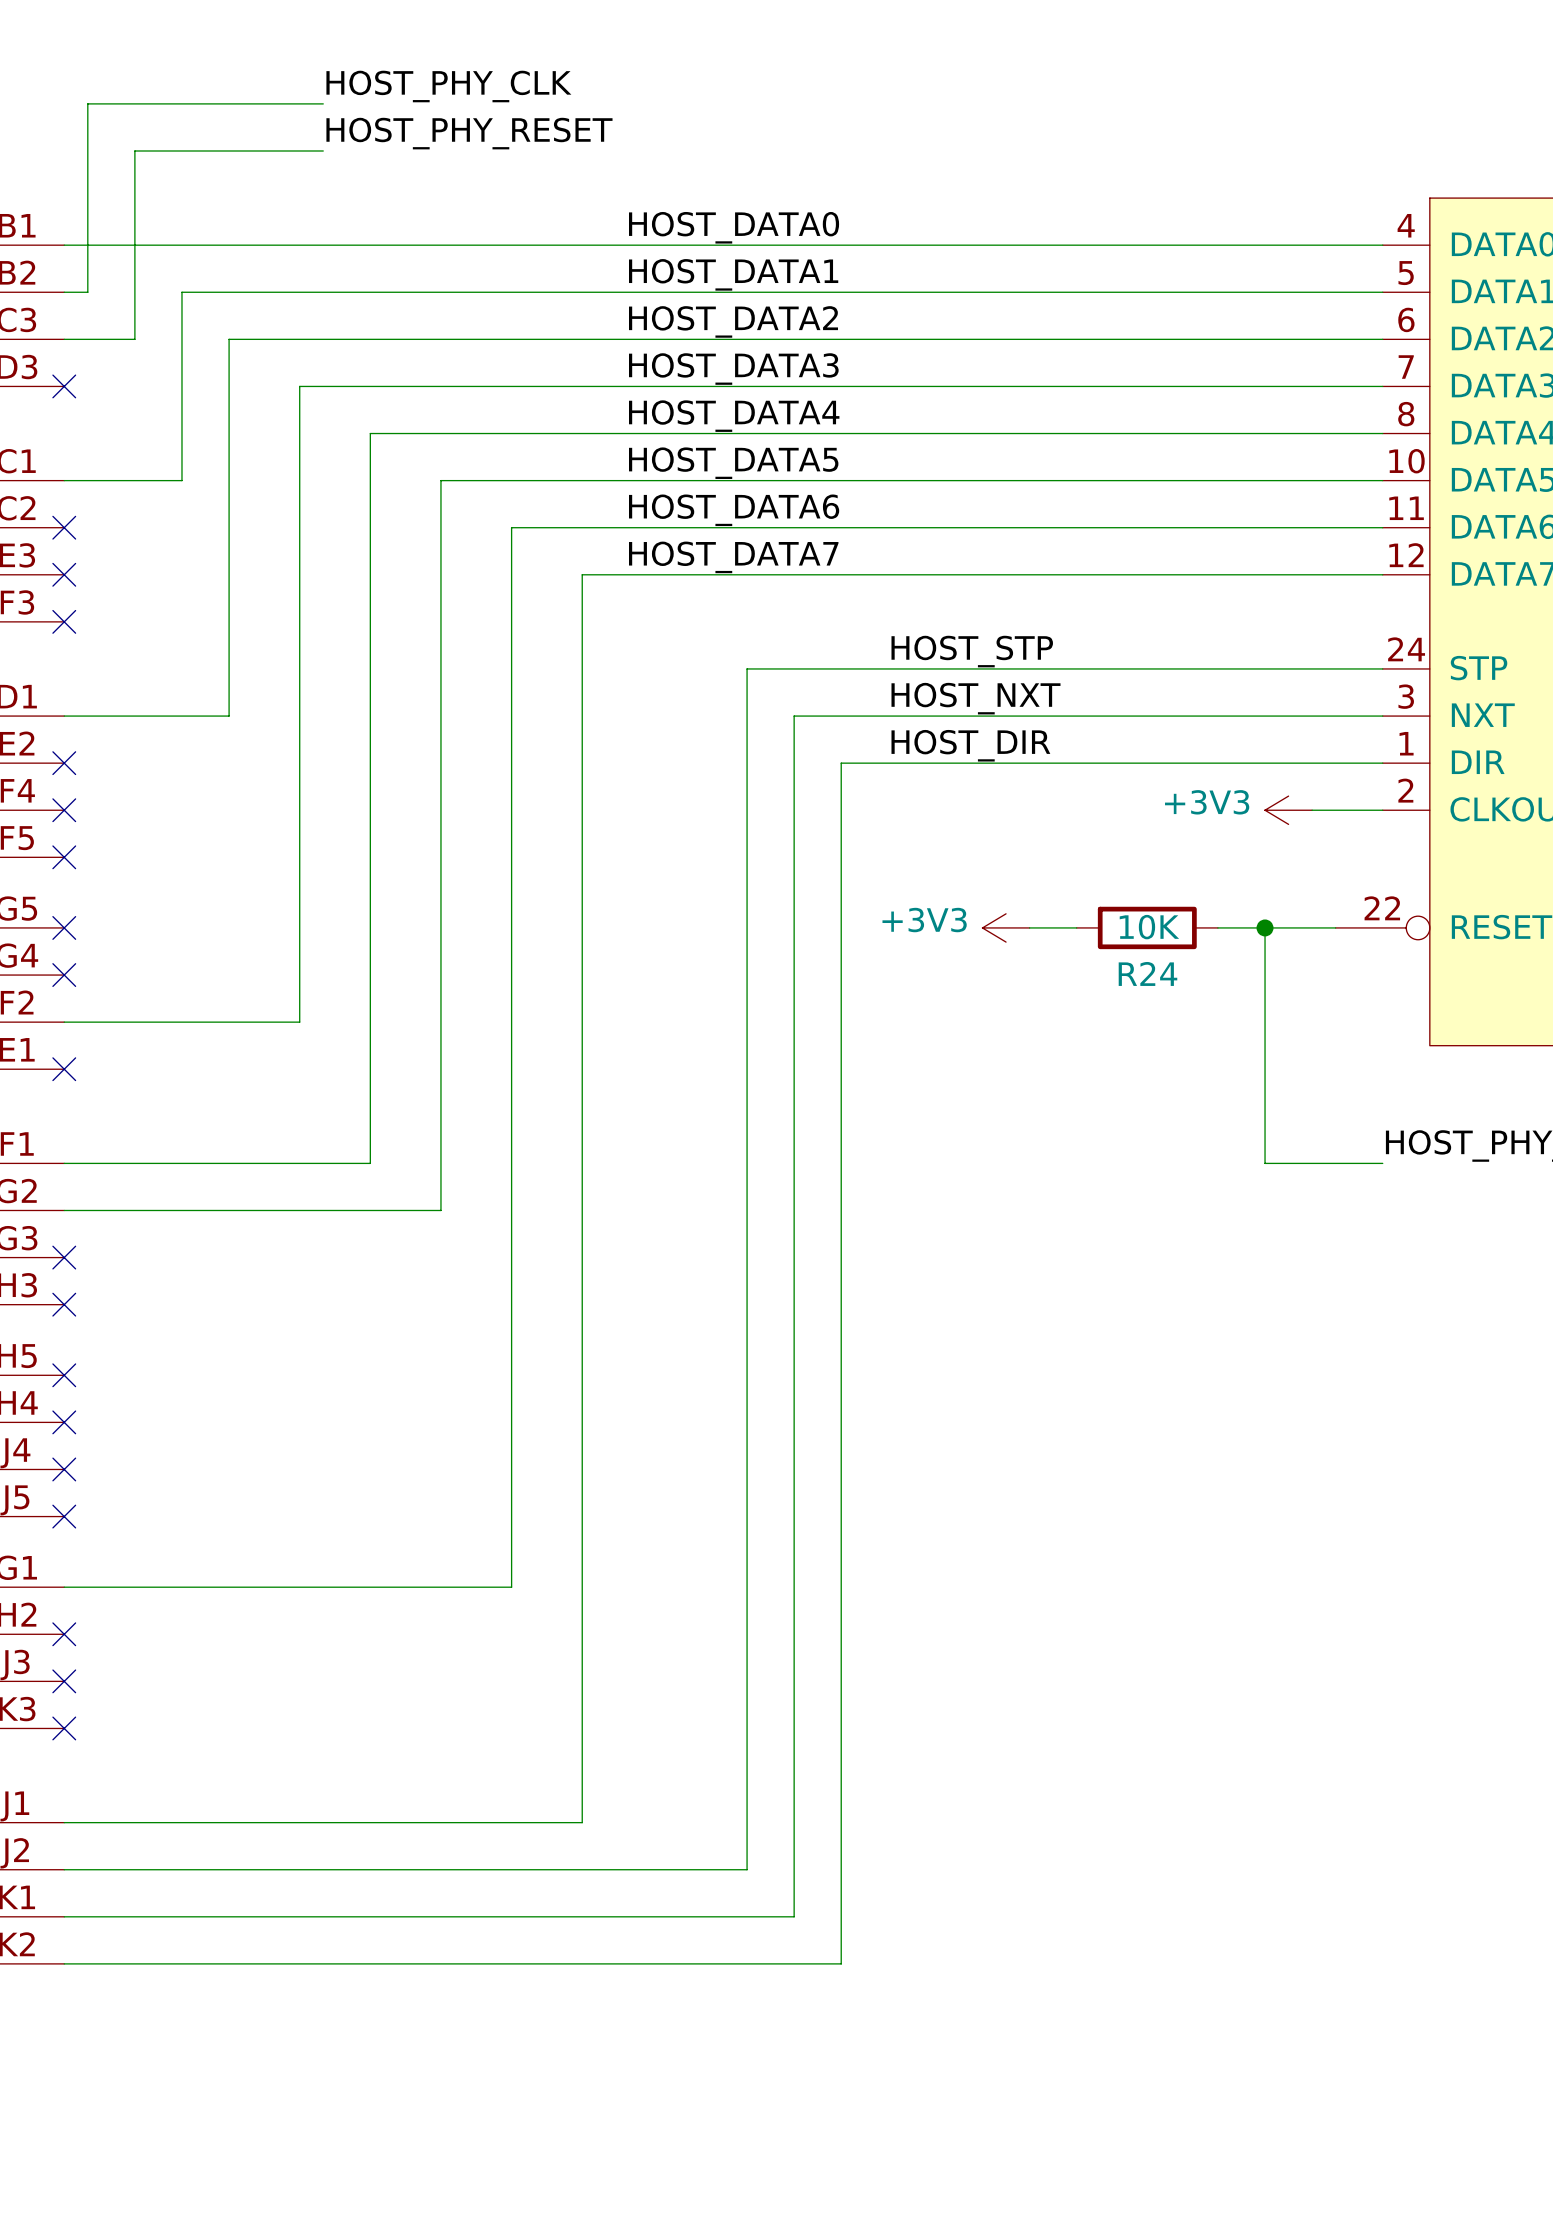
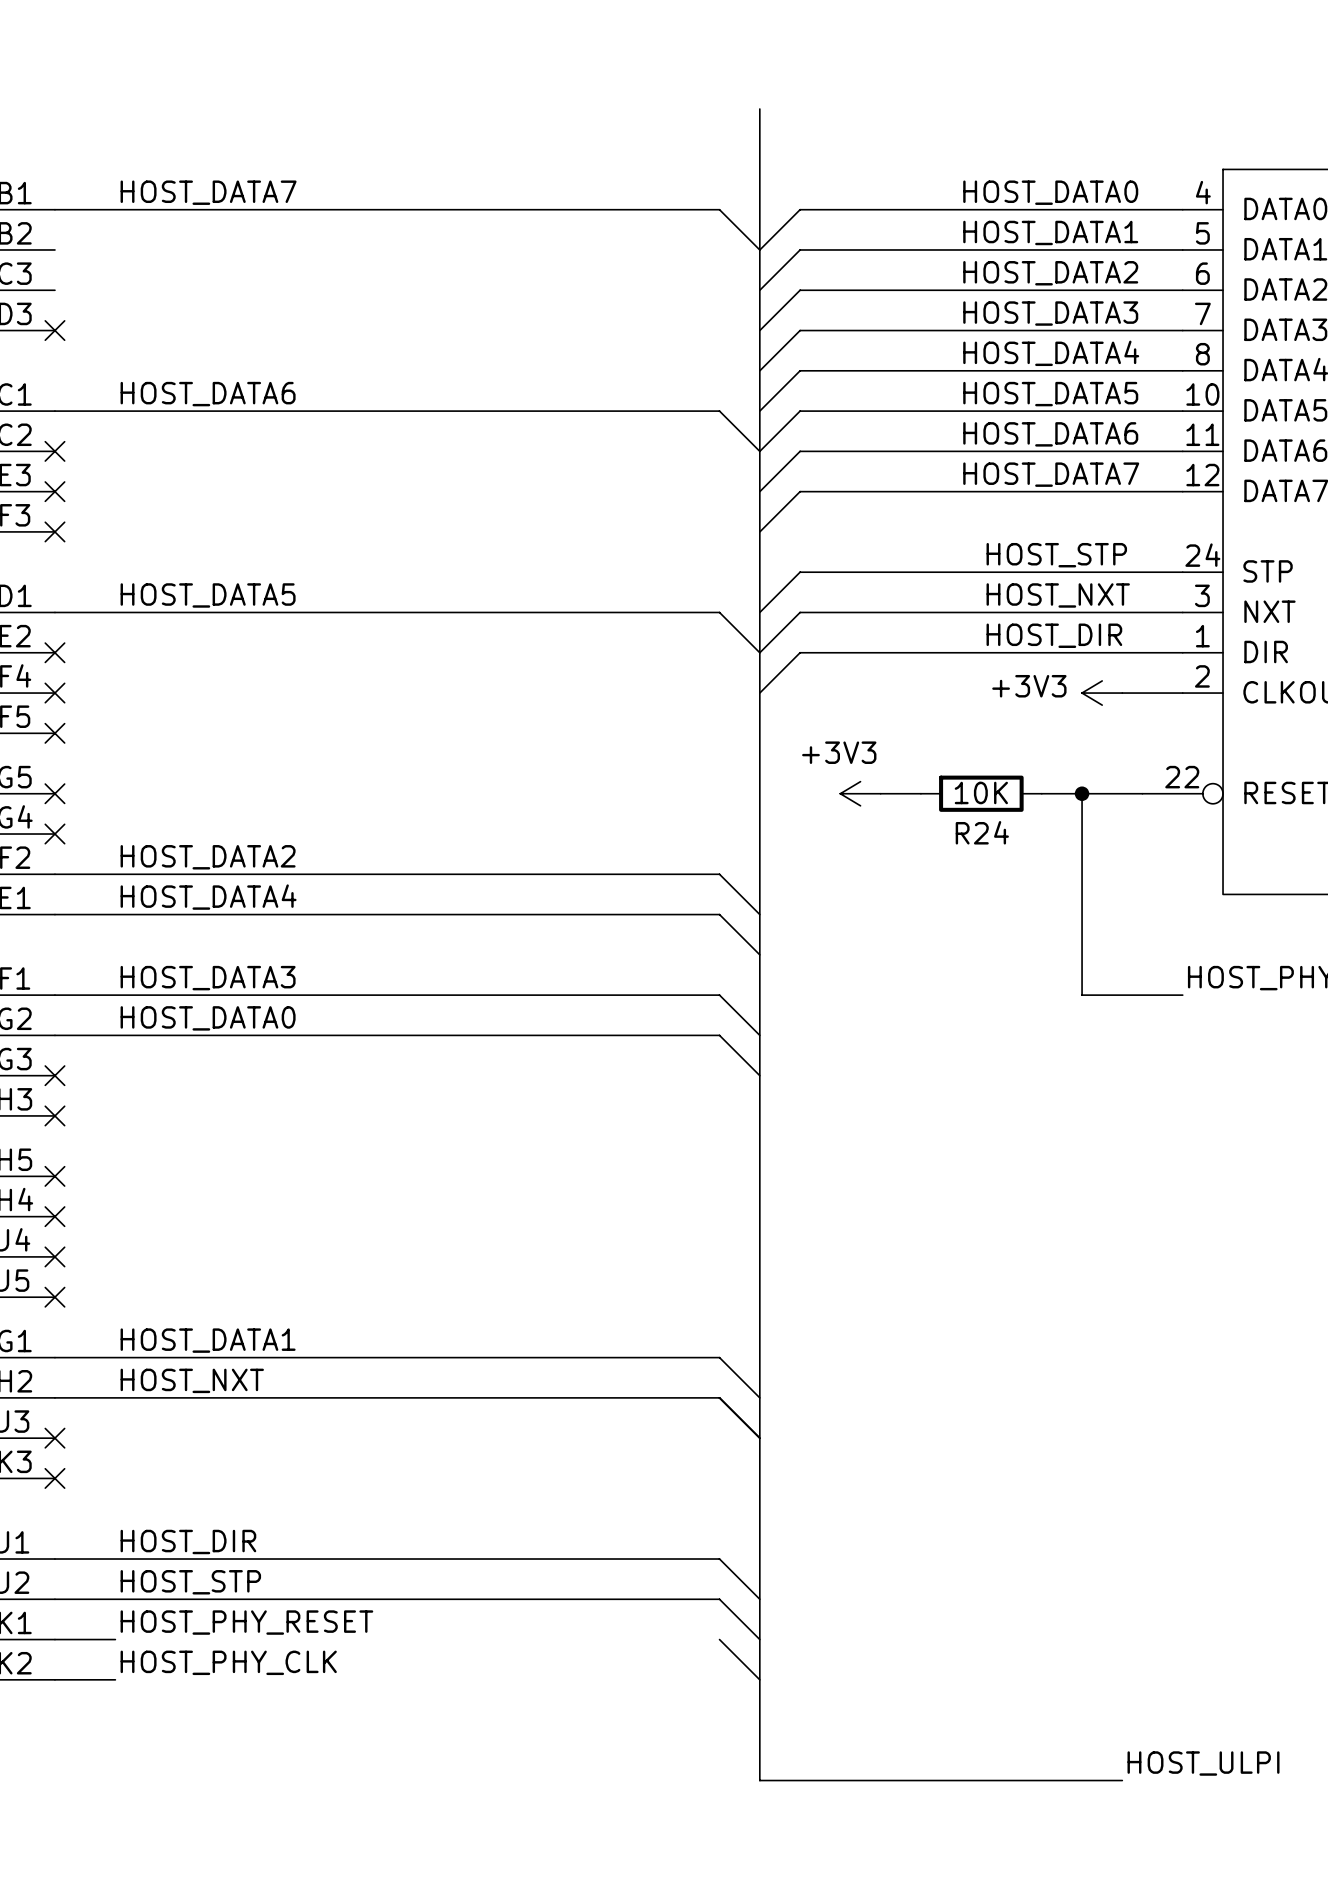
label: HOST_PHY_CLK (448, 86) -> none
wire: (323, 103) (87, 103) (87, 292) (64, 292) -> none
bus: none -> (759, 109) (759, 1780) (1122, 1780)
label: HOST_PHY_RESET (469, 133) -> none
wire: (323, 150) (134, 150) (134, 339) (64, 339) -> none
label: none -> HOST_DATA7 (208, 192)
label: HOST_DATA0 (734, 227) -> none
label: none -> HOST_DATA0 (1050, 192)
wire: (841, 245) (935, 245) -> (719, 209) (759, 249) (800, 209)
label: HOST_DATA1 (733, 274) -> none
label: none -> HOST_DATA1 (1050, 232)
wire: (935, 292) (181, 292) (181, 480) -> (377, 411) (155, 411)
wire: none -> (800, 249) (759, 290)
label: HOST_DATA2 (733, 321) -> none
label: none -> HOST_DATA2 (1050, 273)
wire: (935, 339) (229, 339) (229, 716) -> (679, 612) (195, 612)
wire: none -> (800, 290) (759, 330)
label: HOST_DATA3 (733, 369) -> none
label: none -> HOST_DATA3 (1050, 313)
wire: (935, 386) (299, 386) (299, 1022) -> (759, 914) (719, 874) (256, 874)
wire: none -> (800, 330) (759, 370)
label: HOST_DATA4 (734, 416) -> none
label: none -> HOST_DATA4 (1051, 353)
wire: (935, 433) (370, 433) (370, 1163) -> (759, 1035) (719, 995) (316, 995)
wire: none -> (800, 370) (759, 411)
label: none -> HOST_DATA6 (208, 394)
label: HOST_DATA5 (733, 463) -> none
label: none -> HOST_DATA5 (1050, 394)
wire: (440, 480) (440, 1210) -> (759, 1075) (719, 1035) (377, 1035)
wire: (841, 480) (935, 480) -> (719, 411) (759, 451) (800, 411)
label: HOST_DATA6 (734, 510) -> none
label: none -> HOST_DATA6 (1050, 434)
wire: (935, 527) (511, 527) (511, 1587) -> (800, 451) (759, 491)
label: HOST_DATA7 (733, 557) -> none
label: none -> HOST_DATA7 (1051, 474)
wire: (935, 574) (582, 574) (582, 1822) -> (800, 491) (759, 531)
label position: HOST_STP (972, 651) -> HOST_STP (1056, 555)
wire: (935, 668) (747, 668) (747, 1869) -> (800, 572) (759, 612)
label: none -> HOST_DATA5 (208, 595)
label position: HOST_NXT (975, 698) -> HOST_NXT (1058, 595)
wire: (794, 716) (794, 1916) (134, 1916) -> none
wire: (841, 716) (935, 716) -> (719, 612) (759, 652) (800, 612)
label position: HOST_DIR (970, 745) -> HOST_DIR (1054, 635)
wire: (935, 763) (841, 763) (841, 1963) (134, 1963) -> (800, 652) (759, 693)
power symbol text position: +3V3 (924, 920) -> +3V3 (839, 752)
label: none -> HOST_DATA2 (208, 857)
label: none -> HOST_DATA4 (208, 897)
wire: none -> (54, 914) (719, 914) (759, 954)
no-connect mark: (64, 1069) -> none
label: none -> HOST_DATA3 (208, 978)
label: none -> HOST_DATA0 (208, 1018)
label: none -> HOST_DATA1 (208, 1340)
wire: none -> (437, 1357) (719, 1357) (759, 1397)
label: none -> HOST_NXT (192, 1380)
wire: none -> (54, 1397) (719, 1397) (759, 1438)
no-connect mark: (64, 1634) -> none
label: none -> HOST_DIR (188, 1541)
wire: none -> (498, 1559) (719, 1559) (759, 1599)
label: none -> HOST_STP (190, 1582)
wire: none -> (638, 1599) (719, 1599) (759, 1639)
label: none -> HOST_PHY_RESET (246, 1622)
wire: none -> (719, 1639) (759, 1679)
label: none -> HOST_PHY_CLK (228, 1662)
label: none -> HOST_ULPI (1203, 1763)

